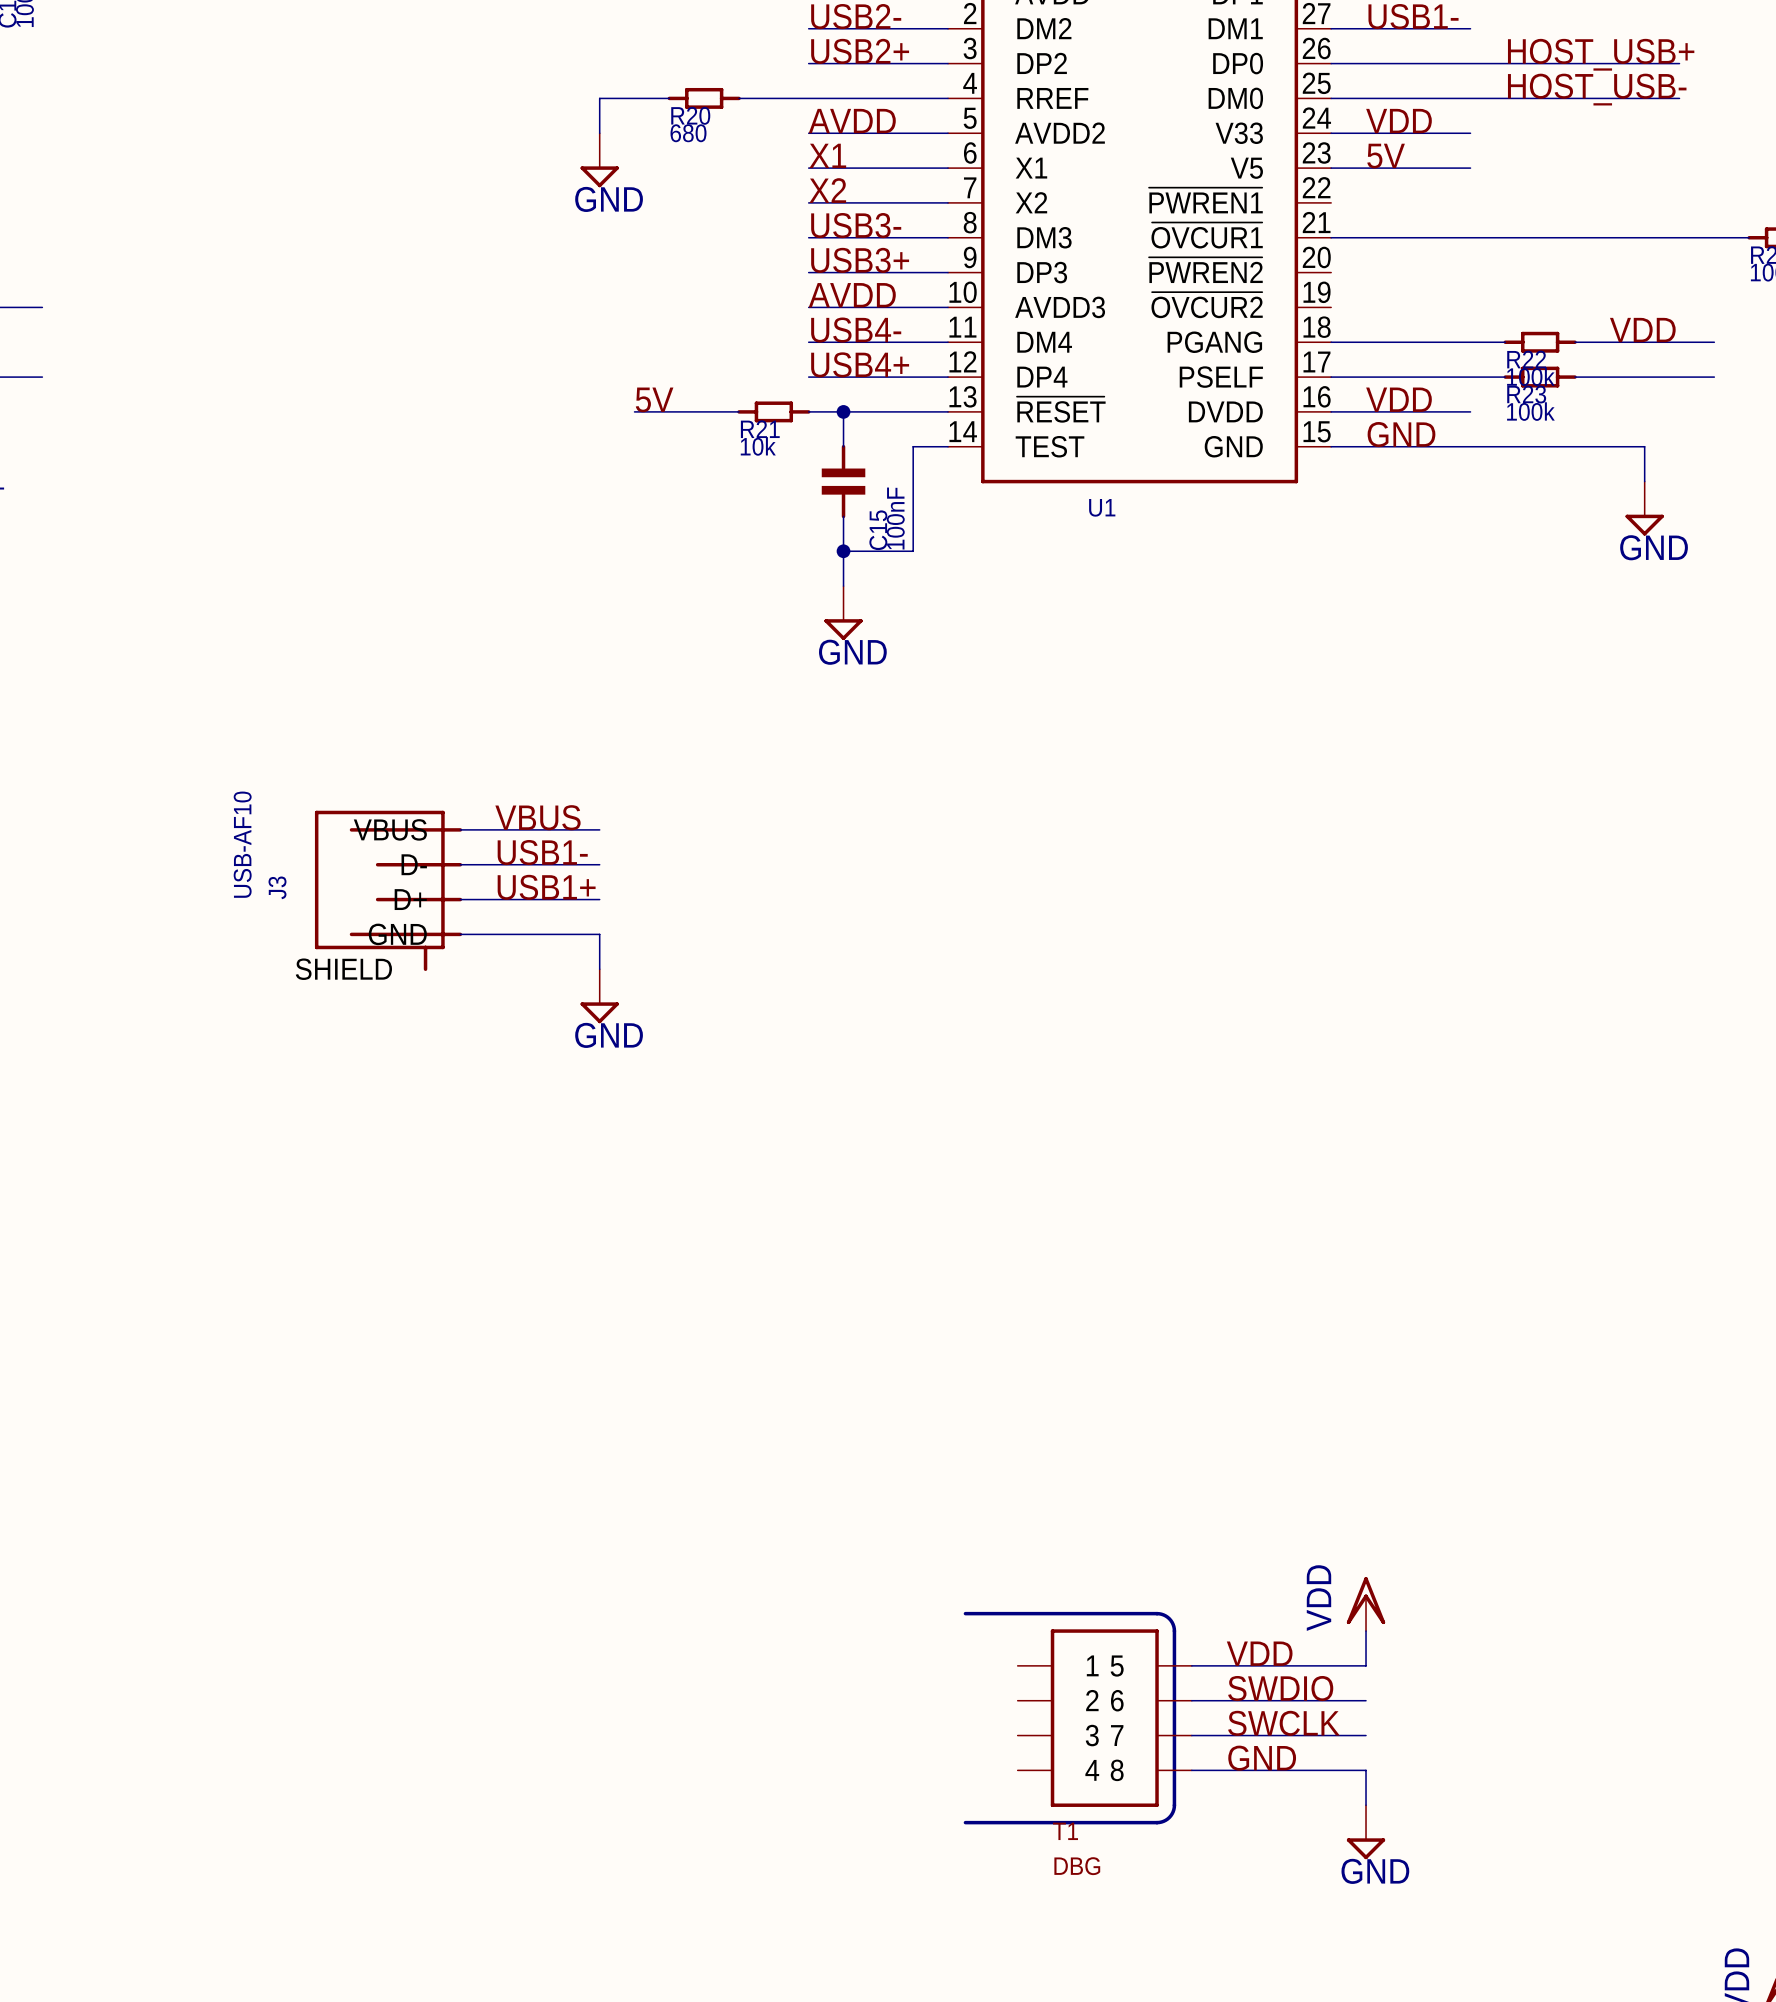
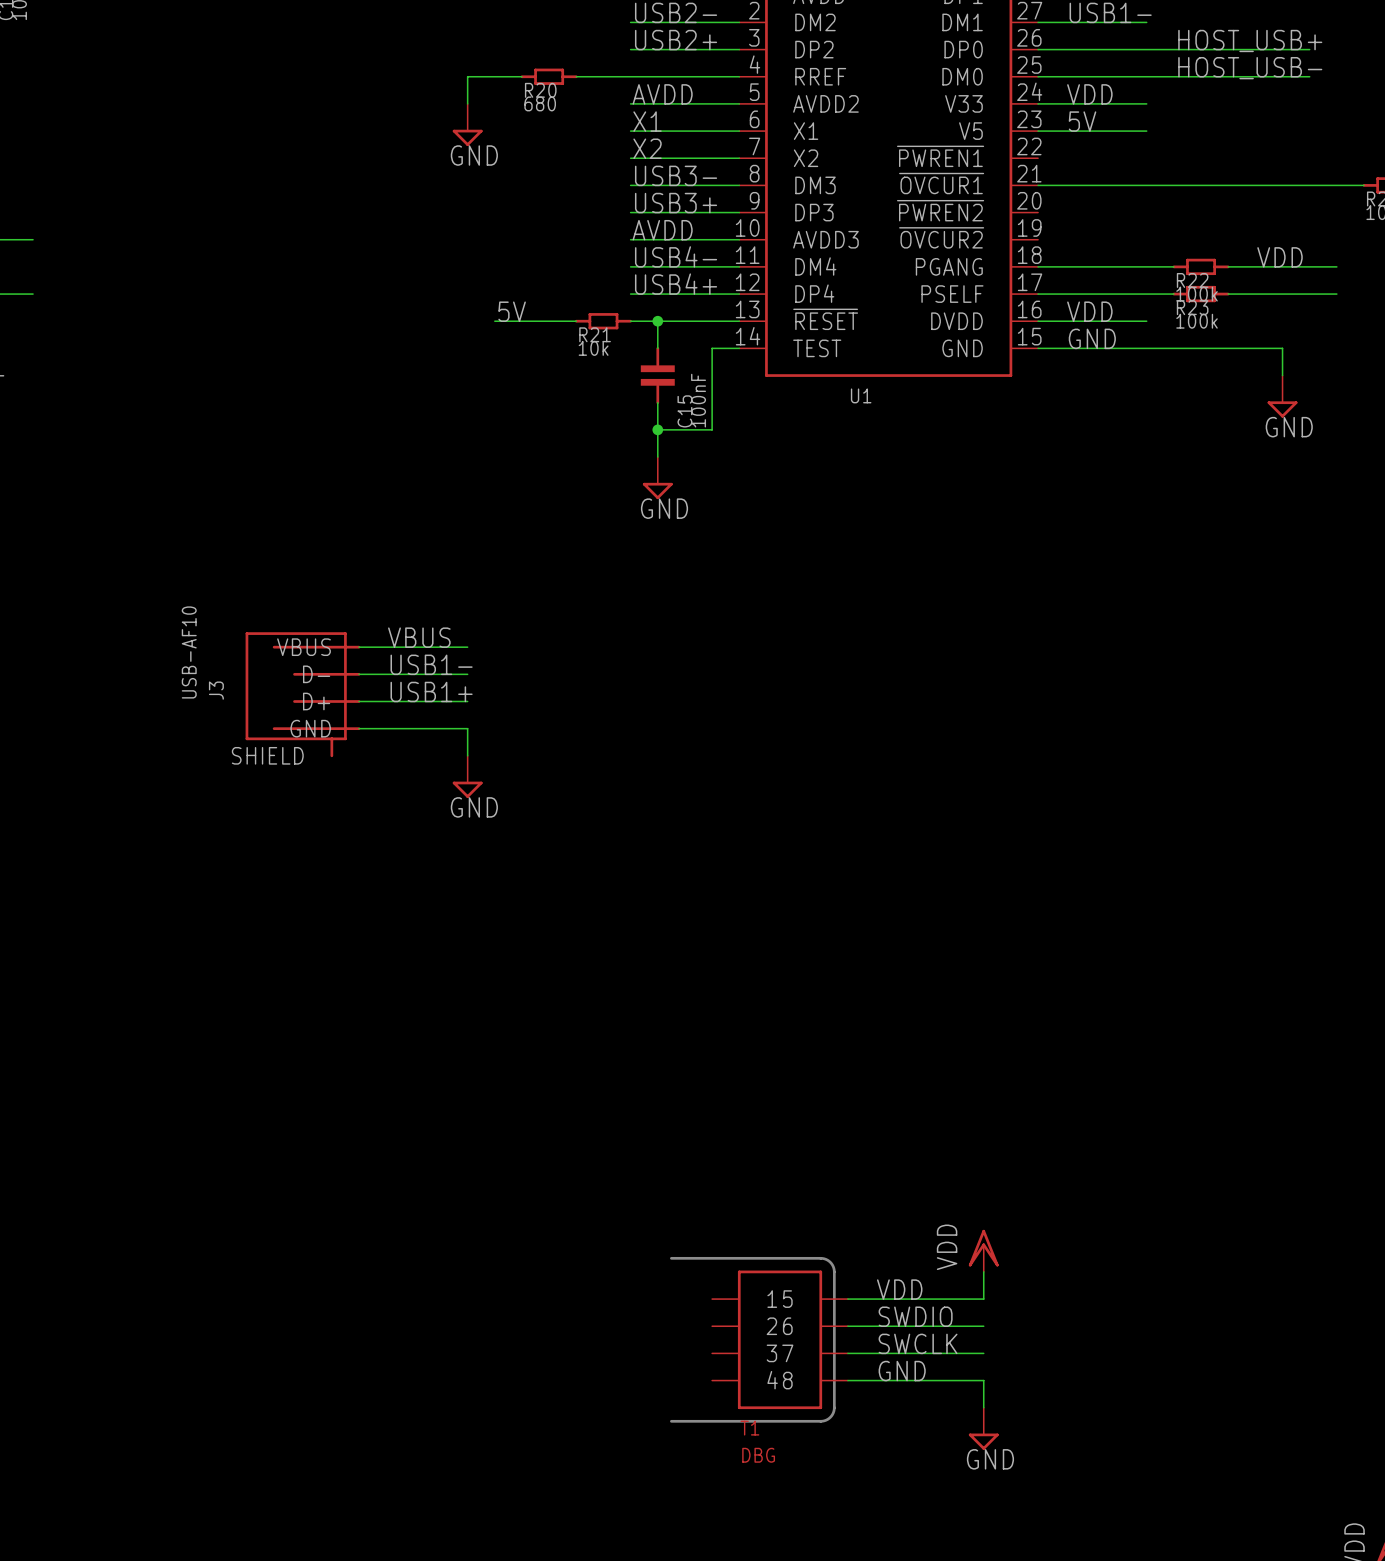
power symbol position: VDD (1366, 1604) -> VDD (983, 1250)
wire: (1366, 1631) (1366, 1665) (1261, 1665) -> (983, 1271) (983, 1299)
label position: VDD (1259, 1653) -> VDD (899, 1289)
wire: none -> (847, 1299) (929, 1299)
label position: SWDIO (1280, 1688) -> SWDIO (915, 1316)
wire: (1261, 1700) (1366, 1700) -> (847, 1326) (929, 1326)
T1 position: (1077, 1718) -> (758, 1339)
label position: SWCLK (1283, 1723) -> SWCLK (918, 1343)
wire: (1261, 1735) (1366, 1735) -> (847, 1353) (929, 1353)
label position: GND (1262, 1758) -> GND (902, 1371)
wire: none -> (847, 1380) (929, 1380)
wire: (1261, 1770) (1366, 1770) (1366, 1805) -> (983, 1380) (983, 1407)
power symbol position: GND (1366, 1832) -> GND (983, 1428)

